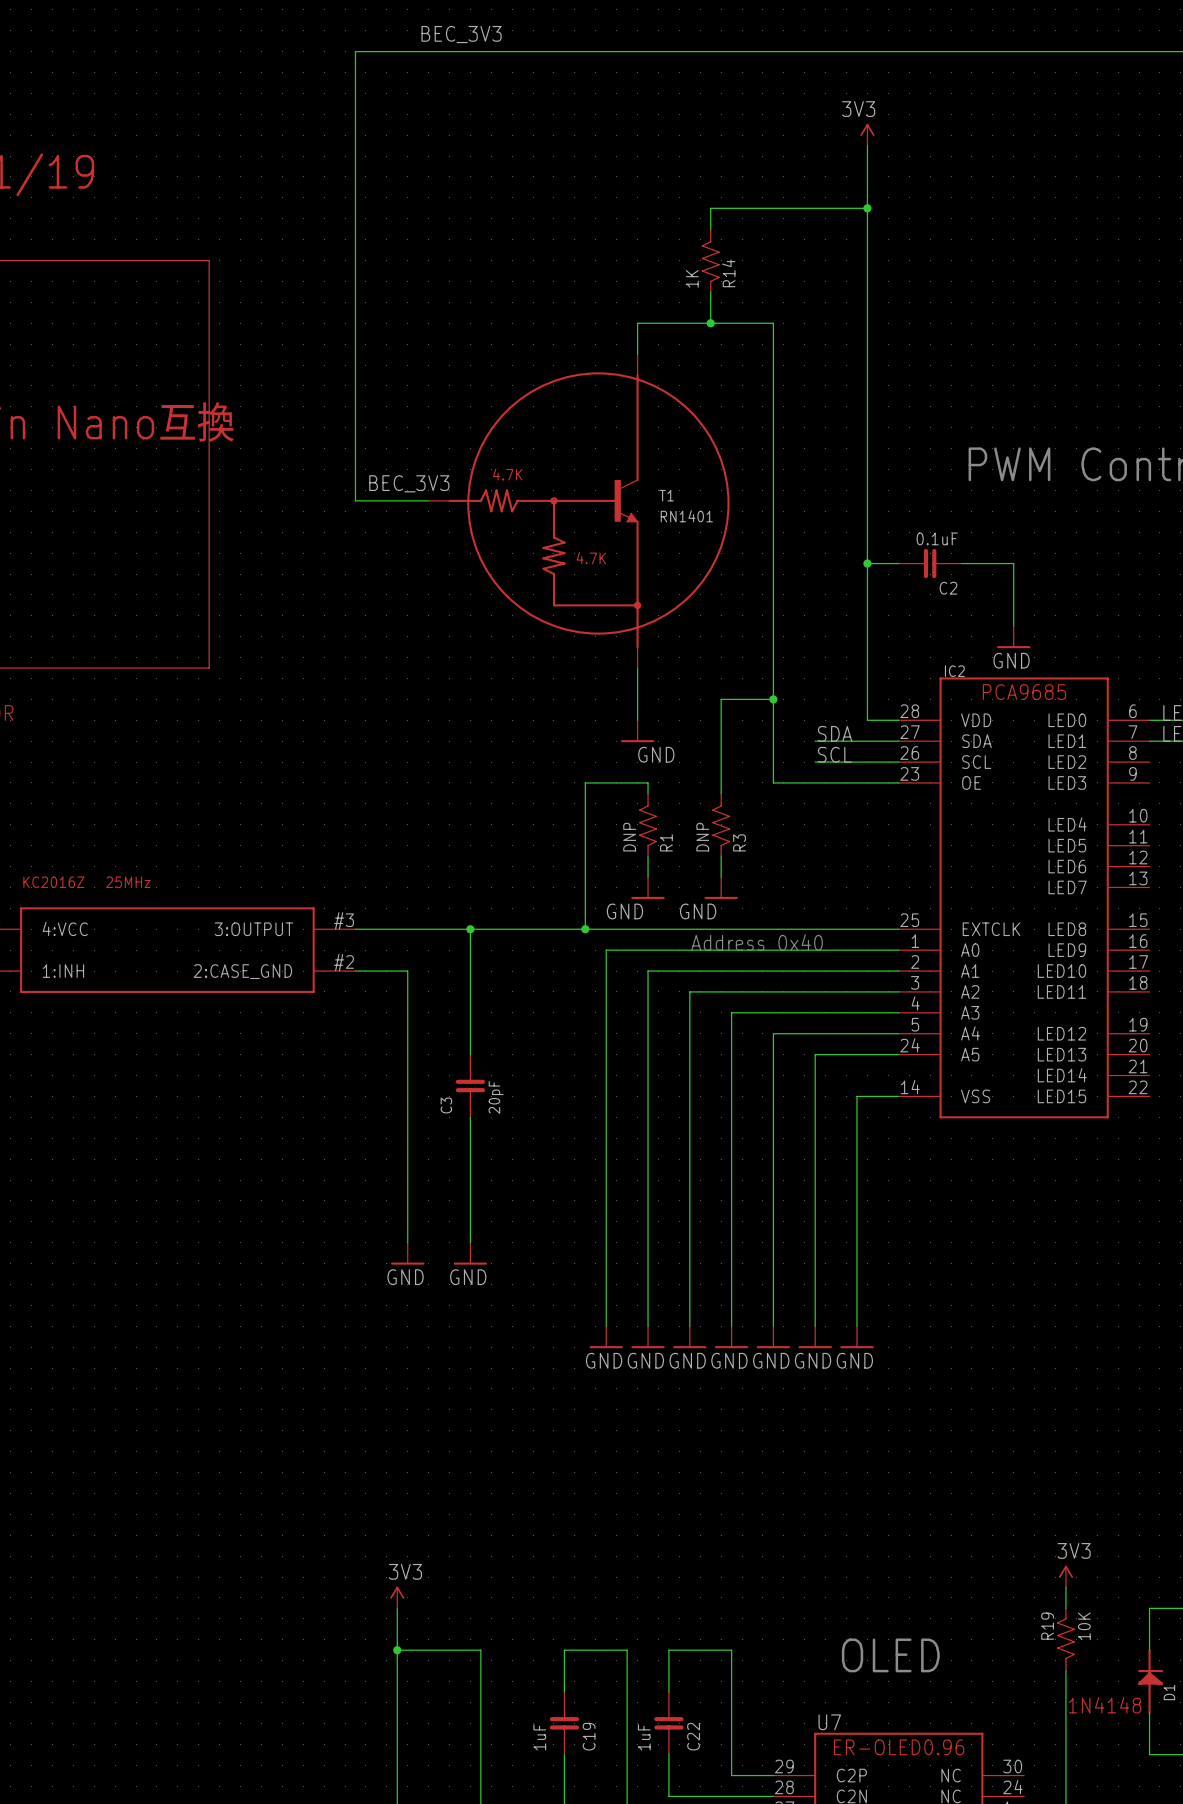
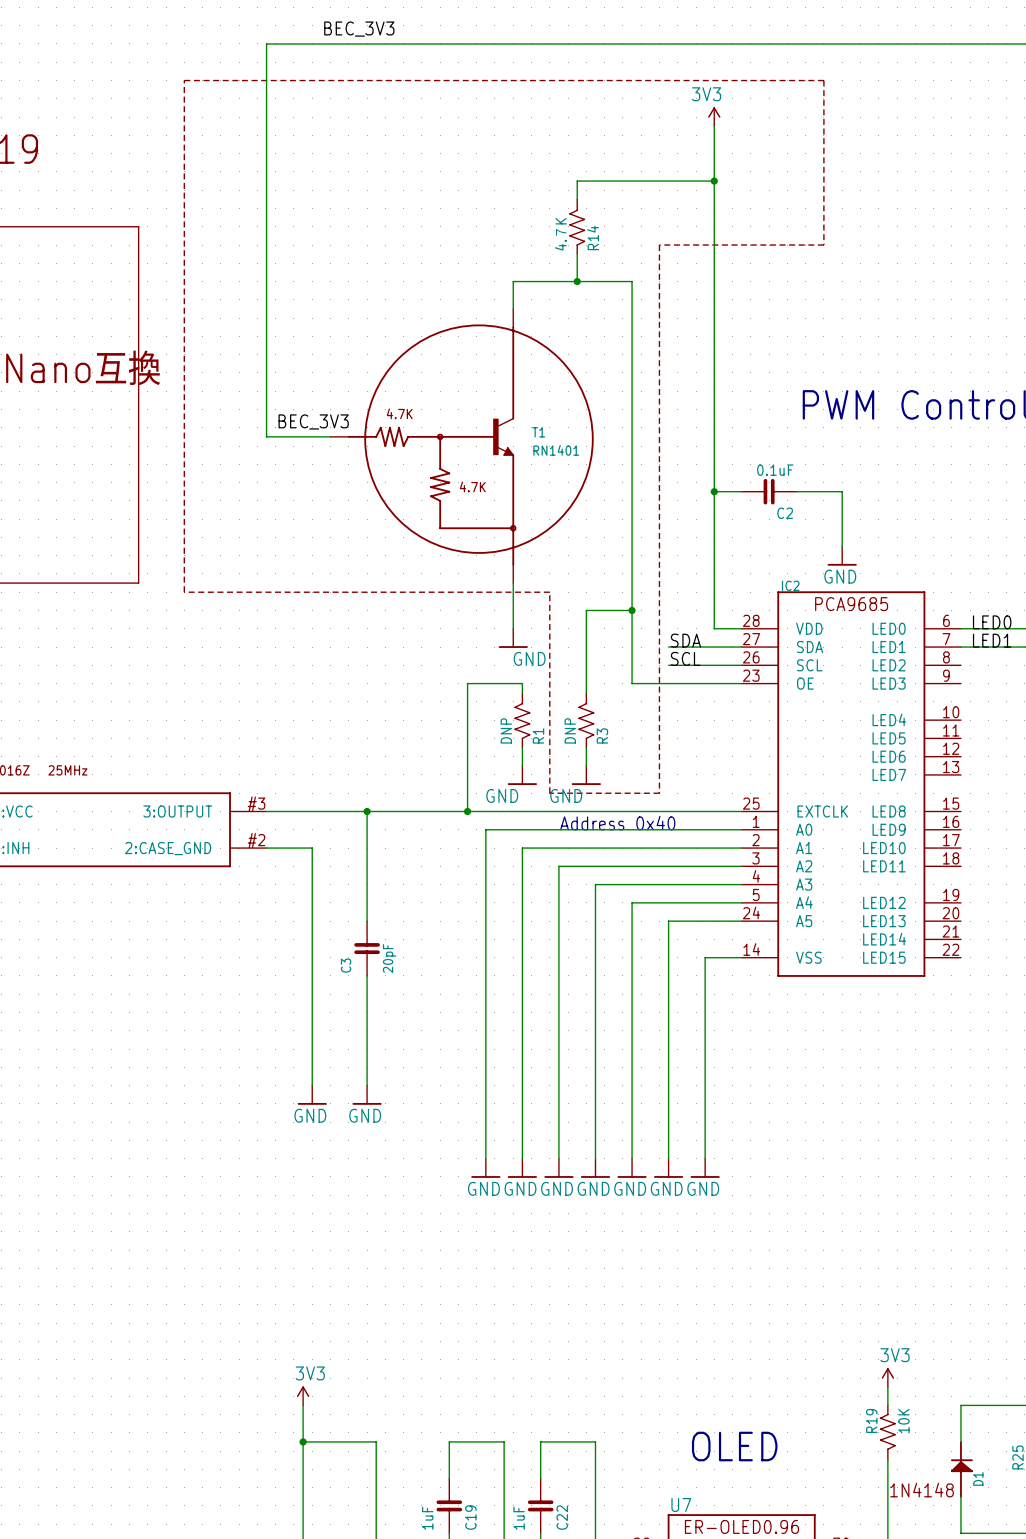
line: none -> (184, 80) (184, 592) (549, 592) (549, 793) (659, 793) (659, 245) (823, 245) (823, 80) (184, 80)
R14 value: 1K (692, 278) -> 4.７K (560, 234)

